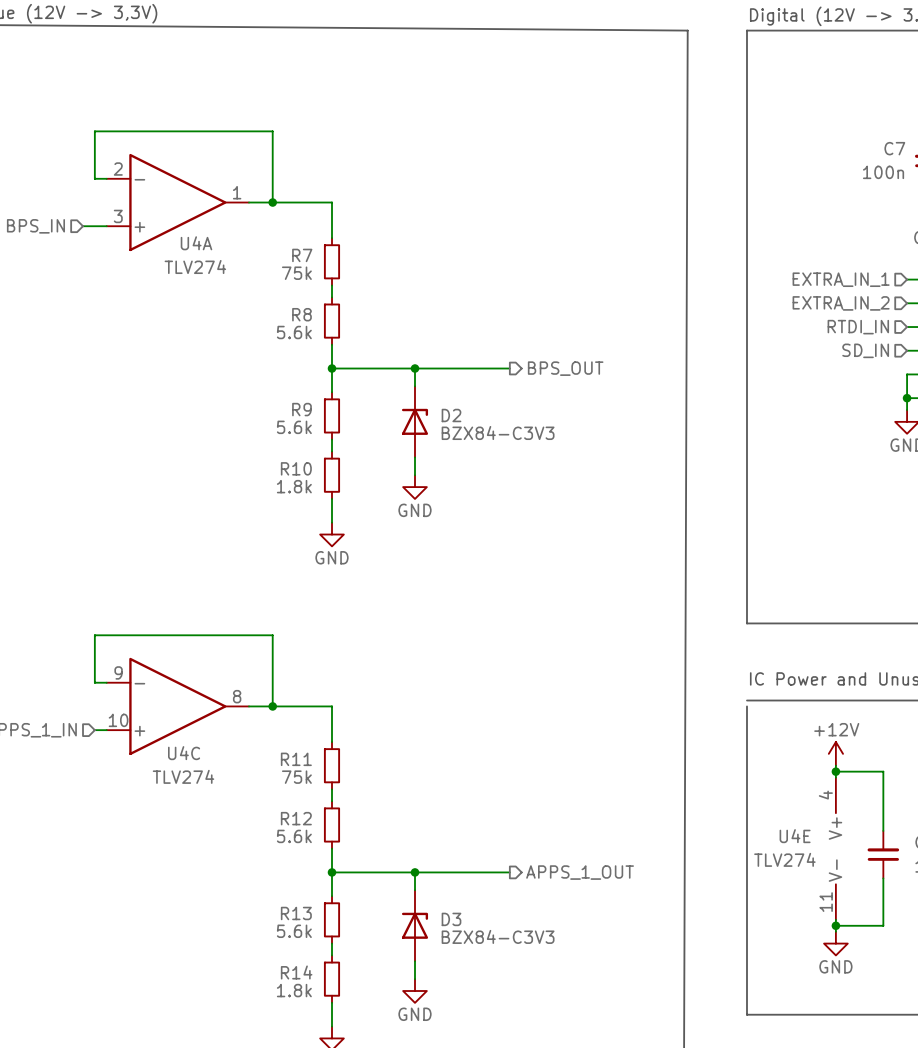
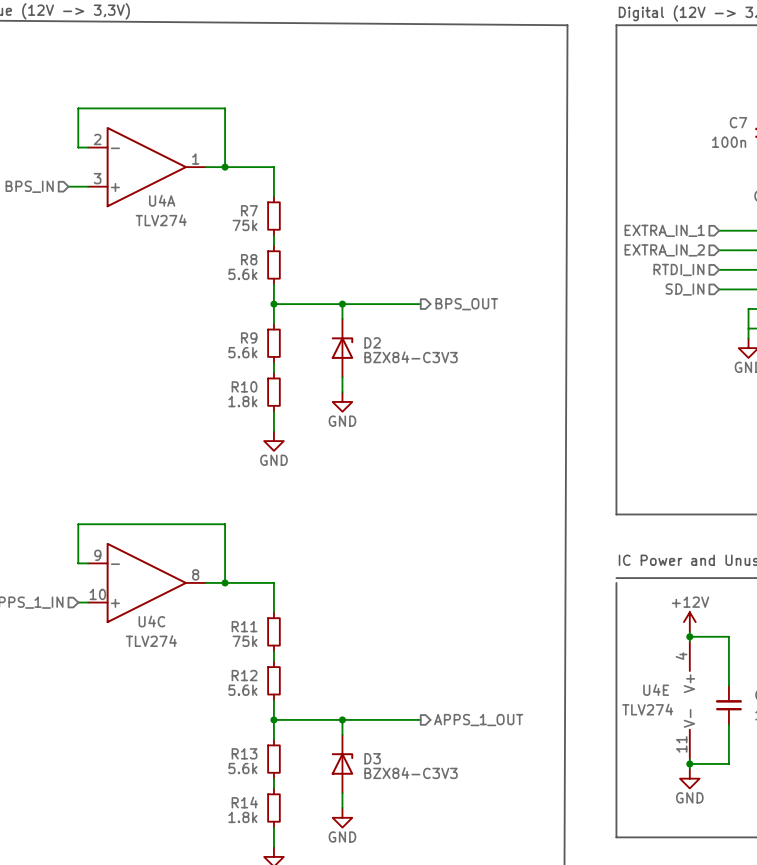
hierarchical label position: EXTRA_IN_1 (841, 279) -> EXTRA_IN_1 (664, 230)
wire: none -> (719, 230) (748, 230)
hierarchical label position: EXTRA_IN_2 (841, 303) -> EXTRA_IN_2 (664, 250)
wire: none -> (719, 250) (748, 250)
hierarchical label position: RTDI_IN (858, 327) -> RTDI_IN (678, 269)
wire: none -> (719, 269) (748, 269)
hierarchical label position: SD_IN (865, 350) -> SD_IN (685, 289)
wire: none -> (719, 289) (748, 289)
junction: (907, 398) -> none

